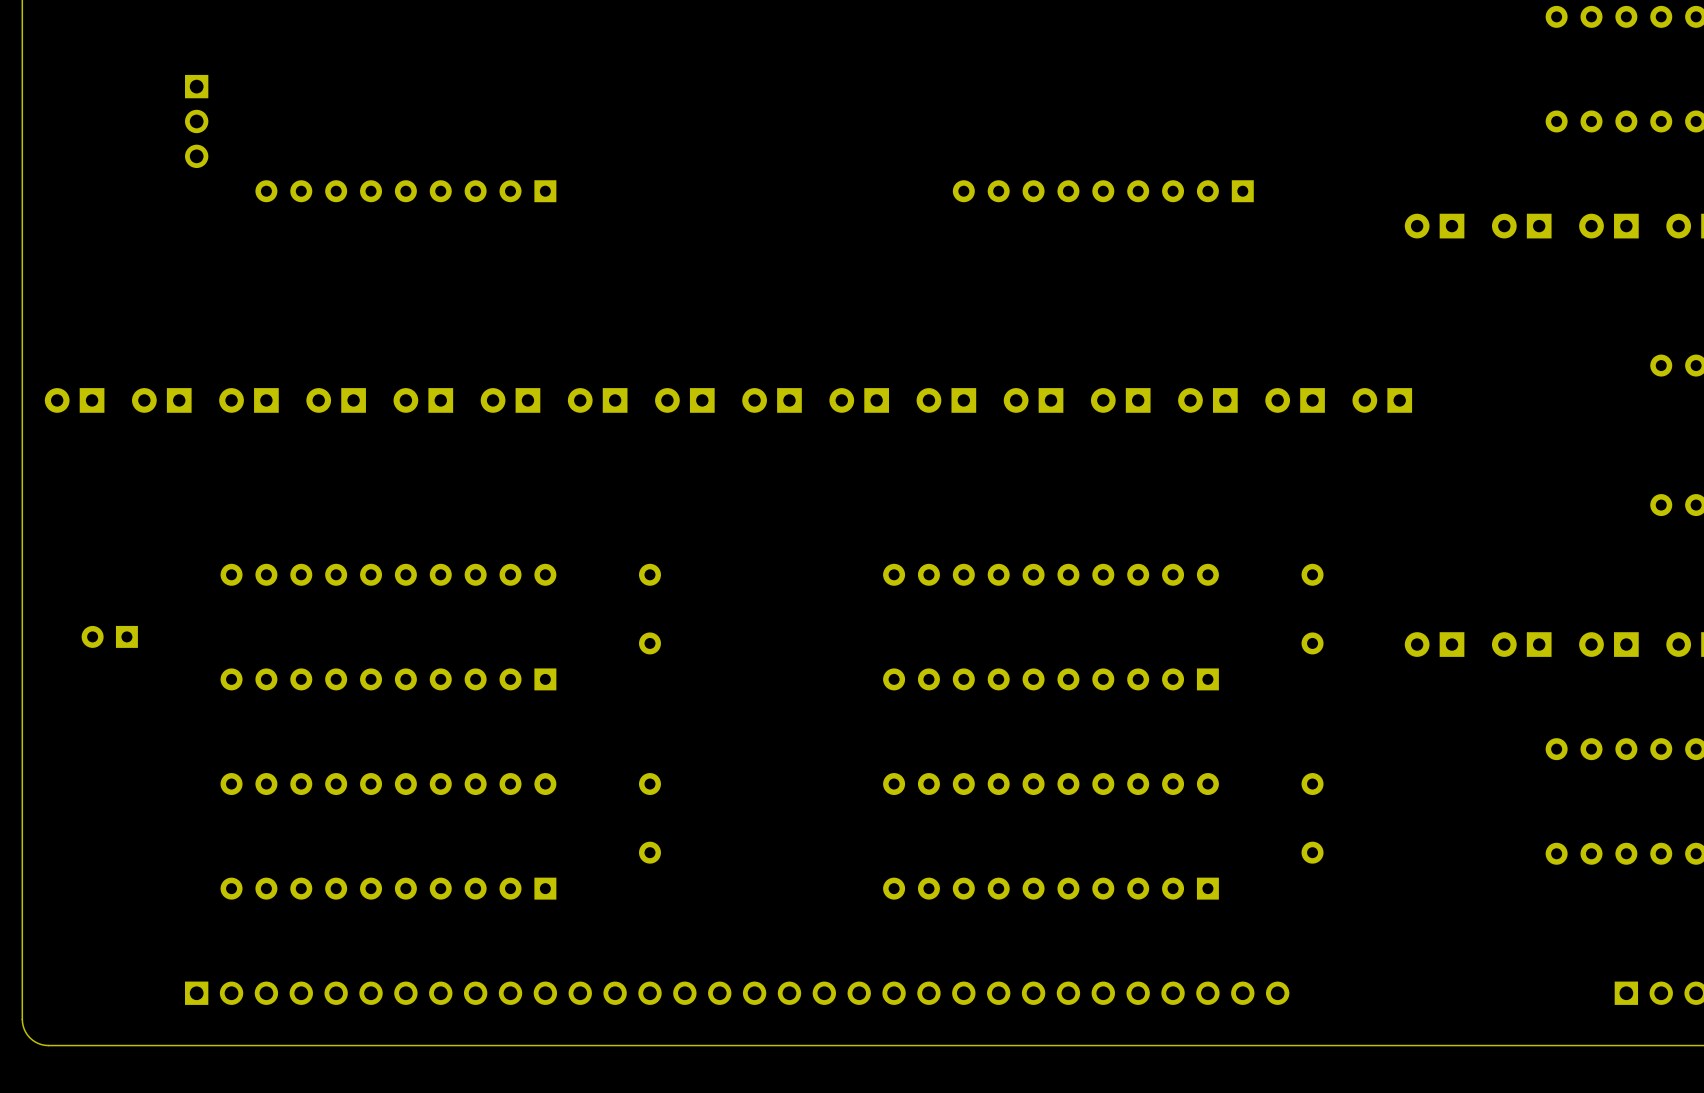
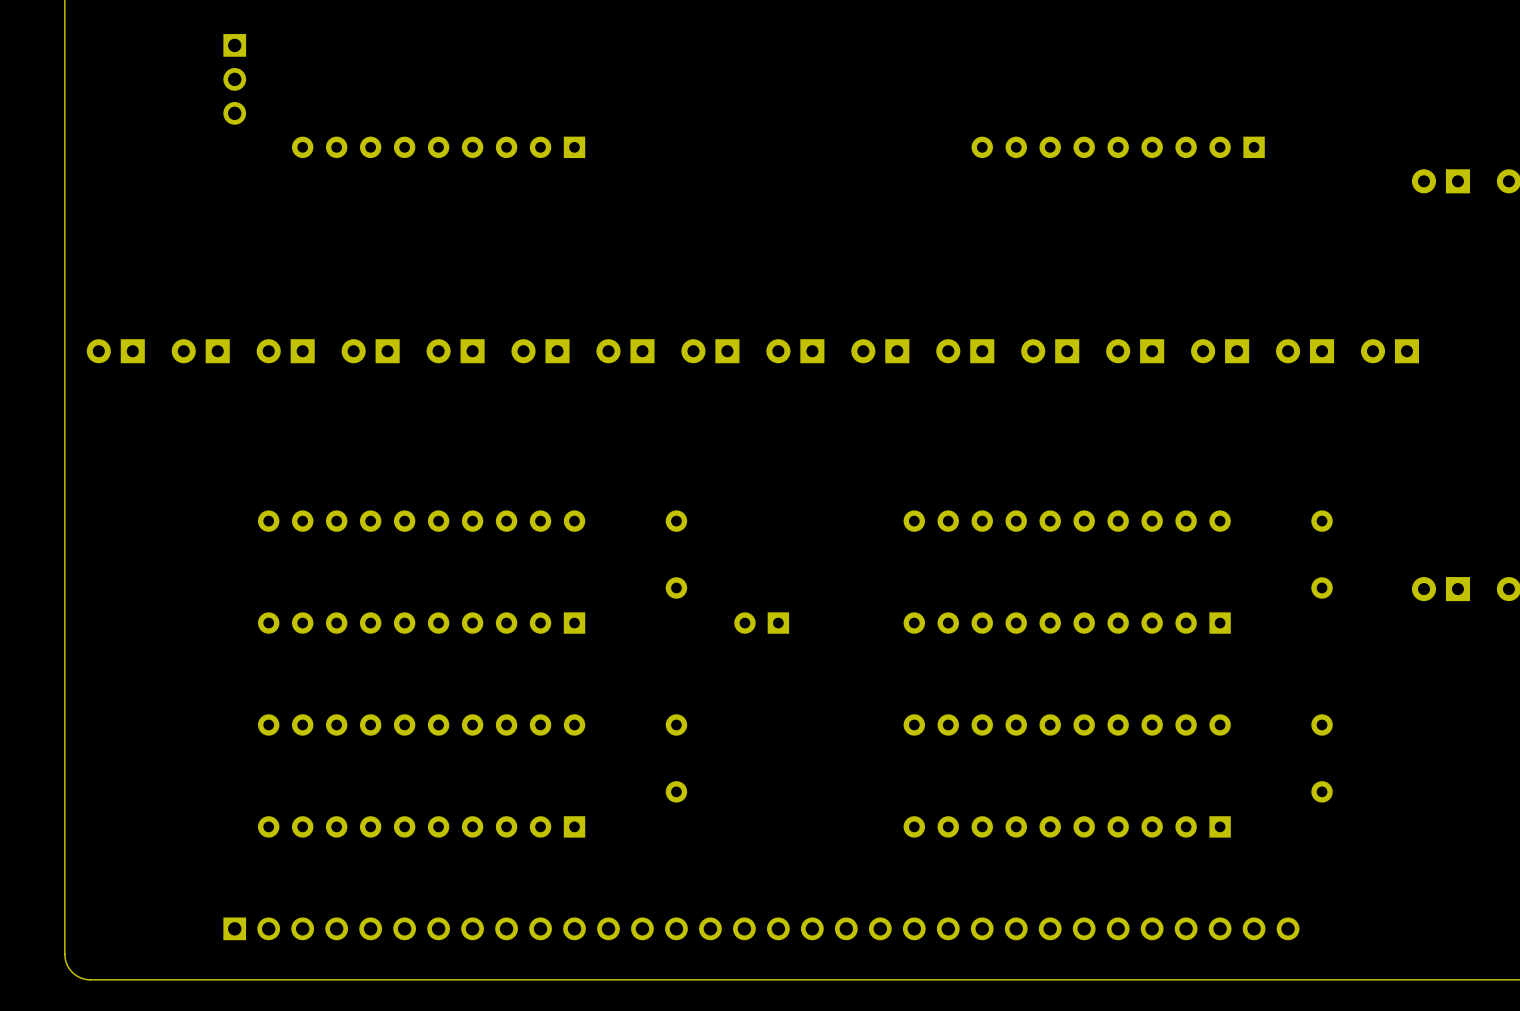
part: (109, 636) -> none
part: none -> (761, 623)

